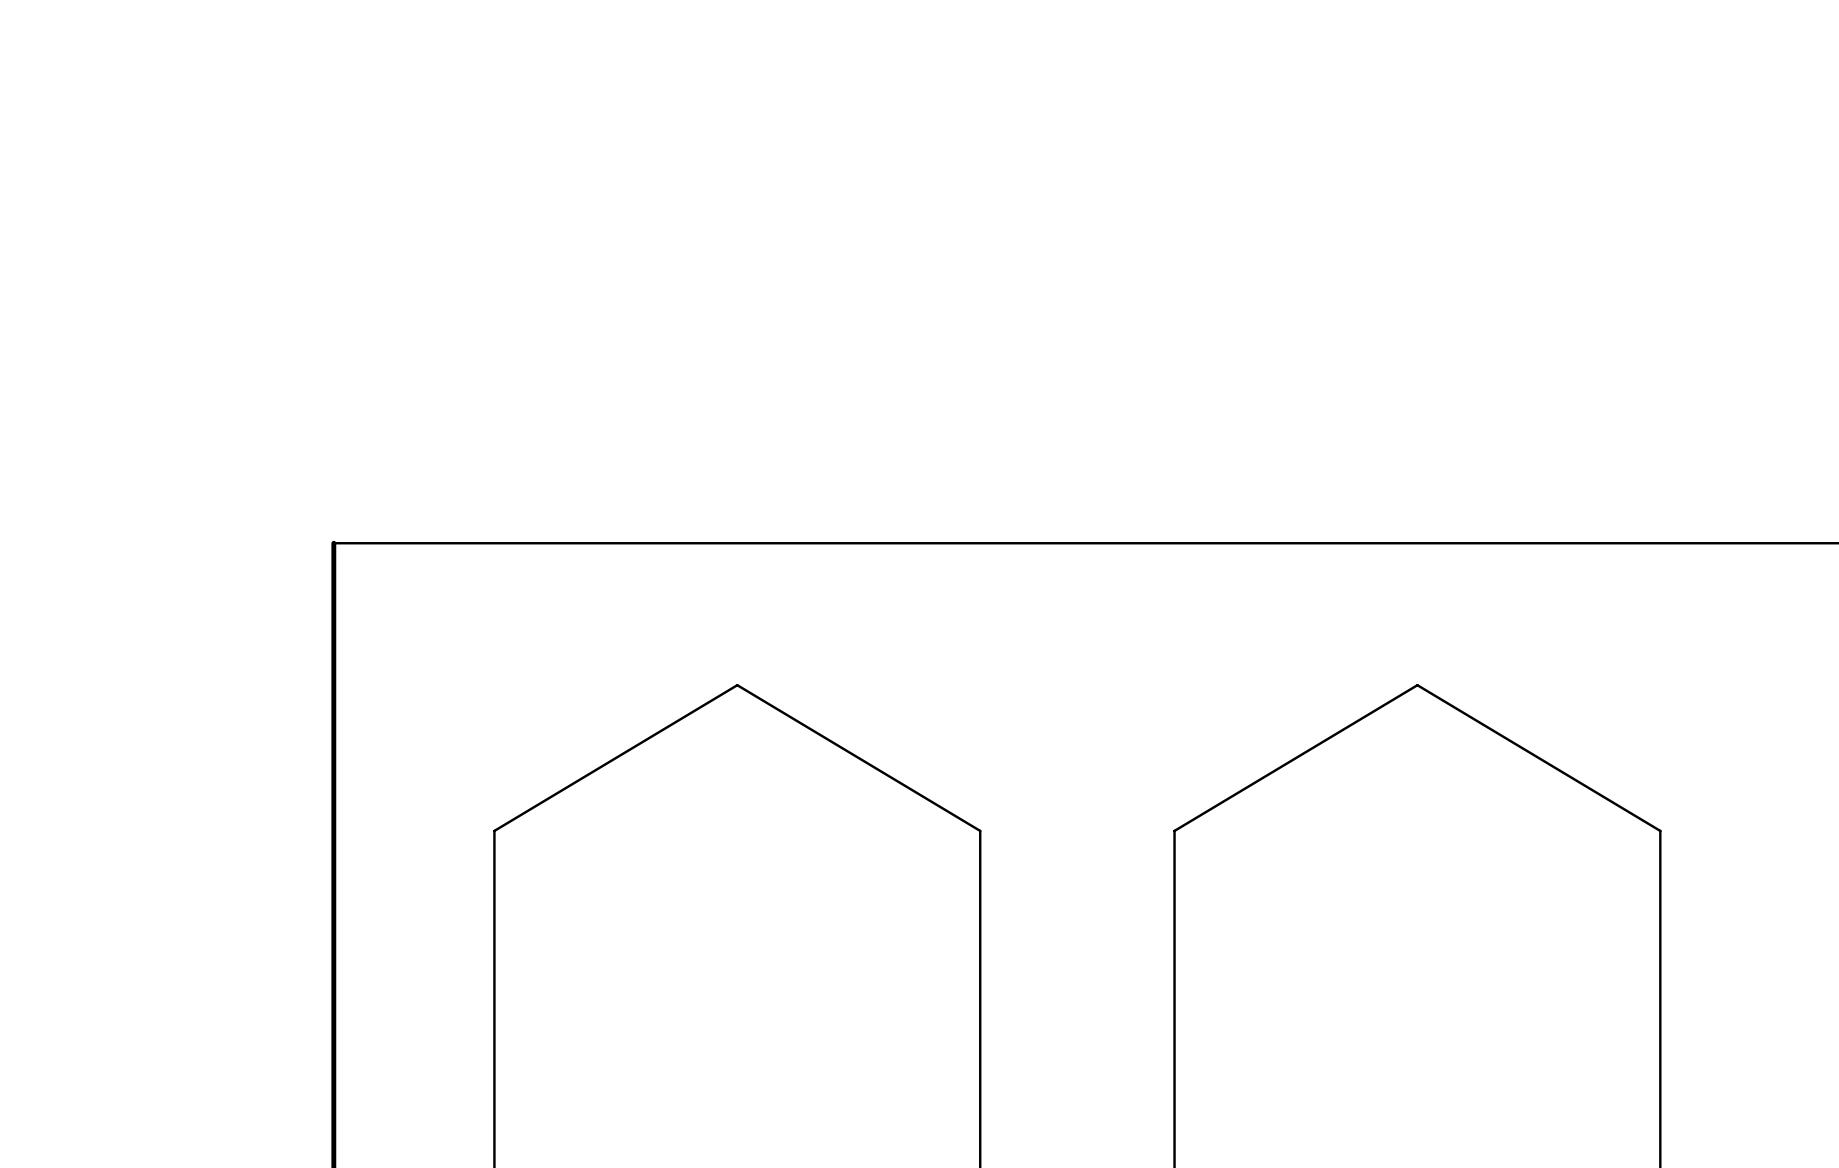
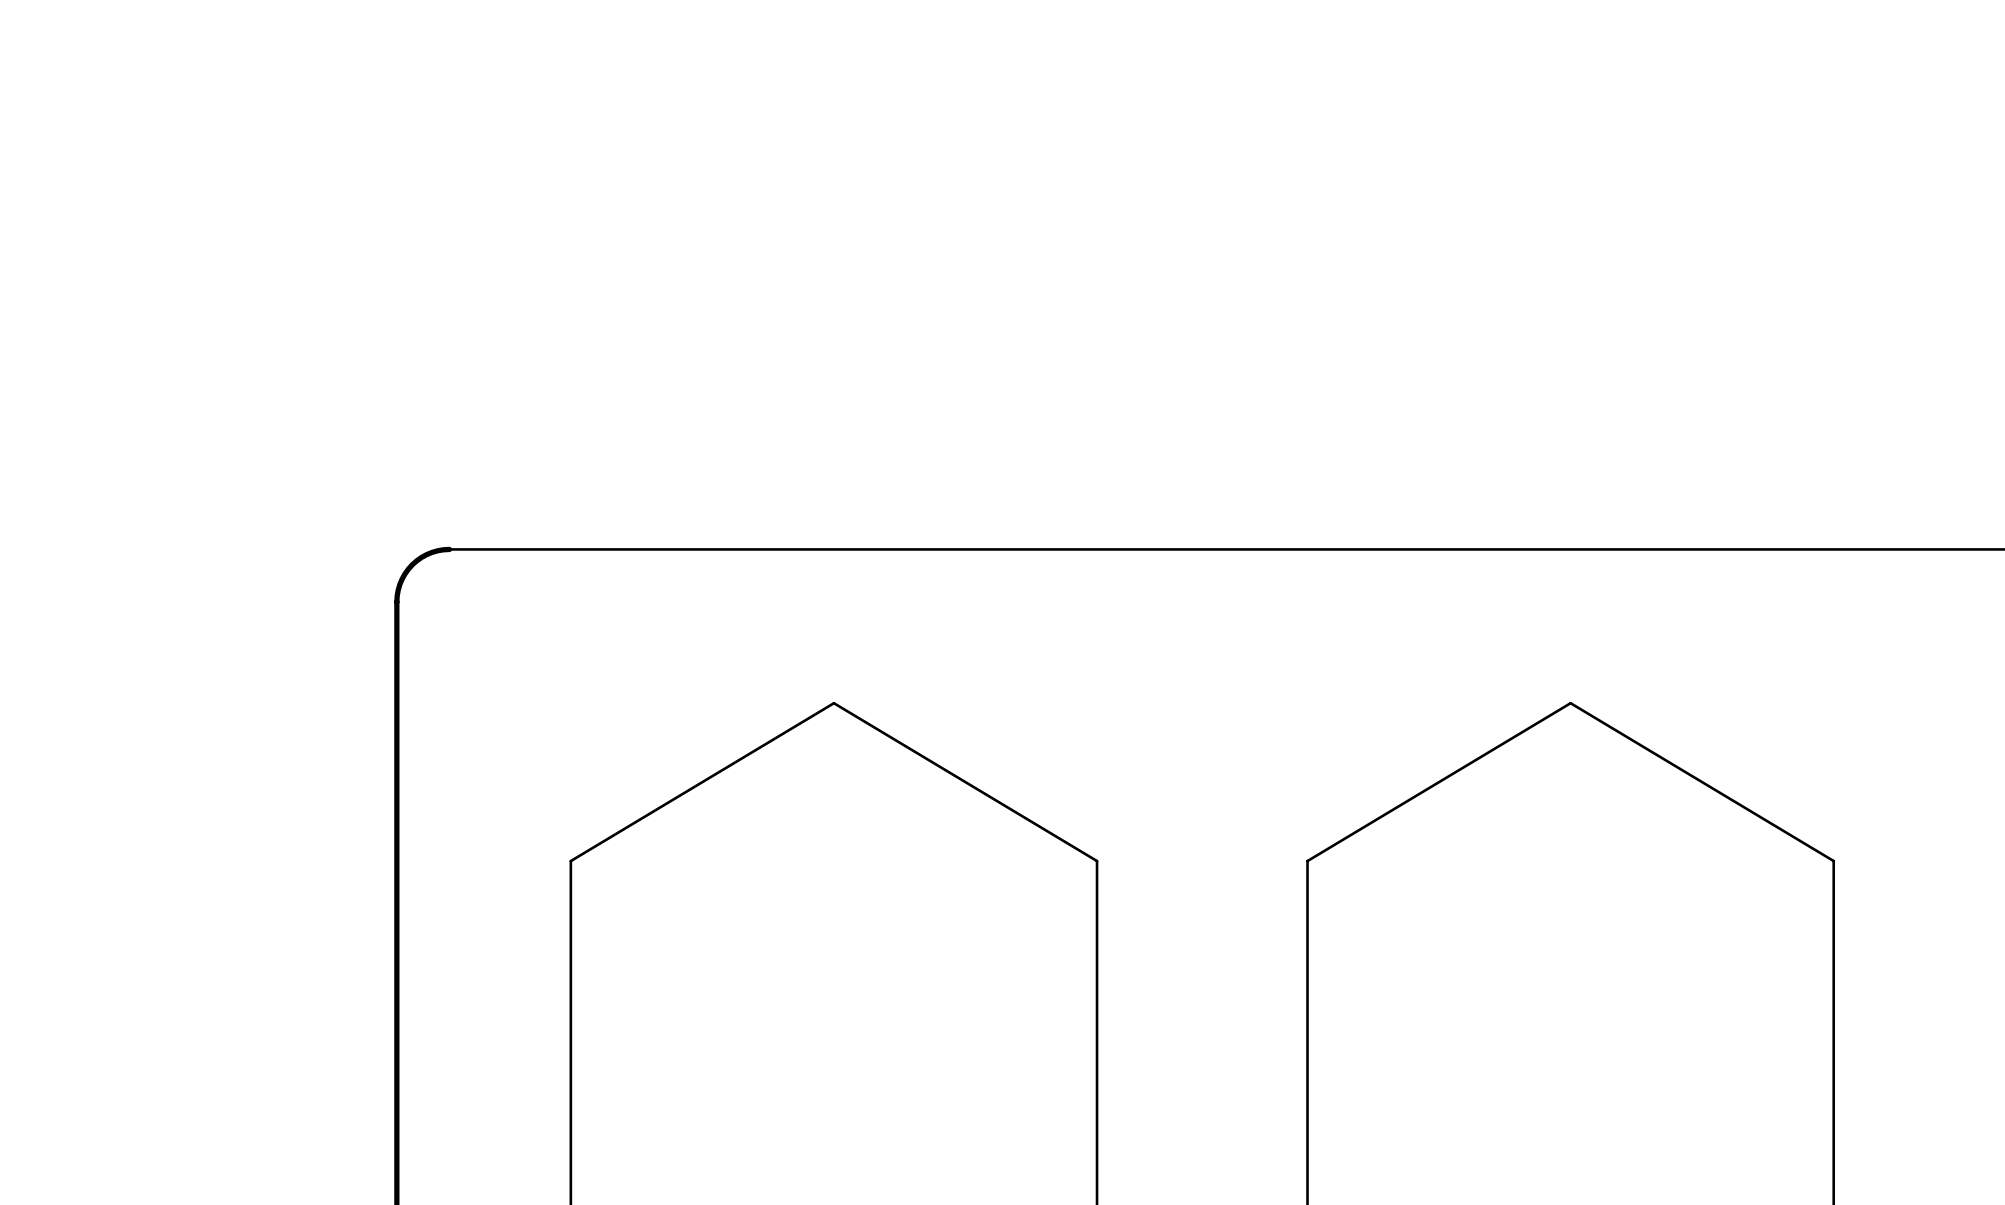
board edge: (382, 543) (333, 543) (333, 591) -> (449, 549) (432, 552) (412, 564) (402, 579) (396, 602)

